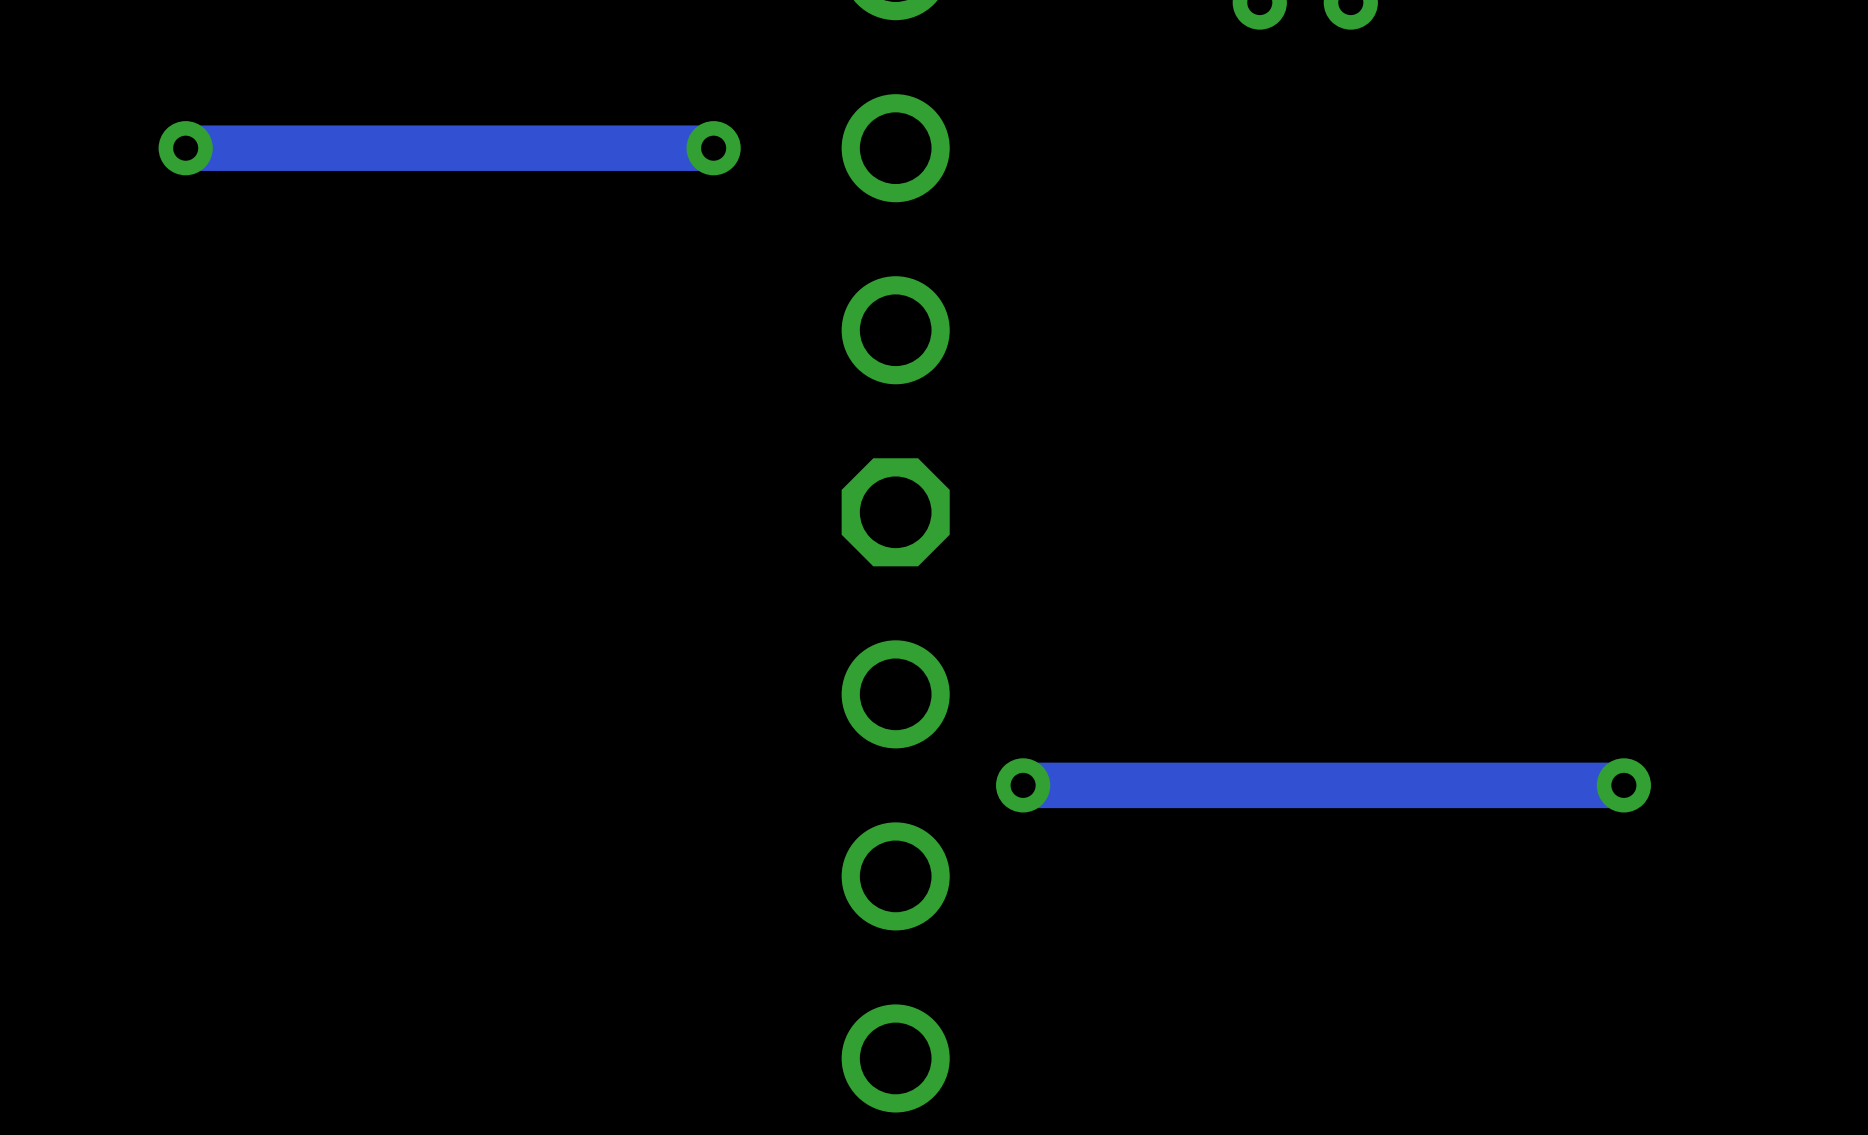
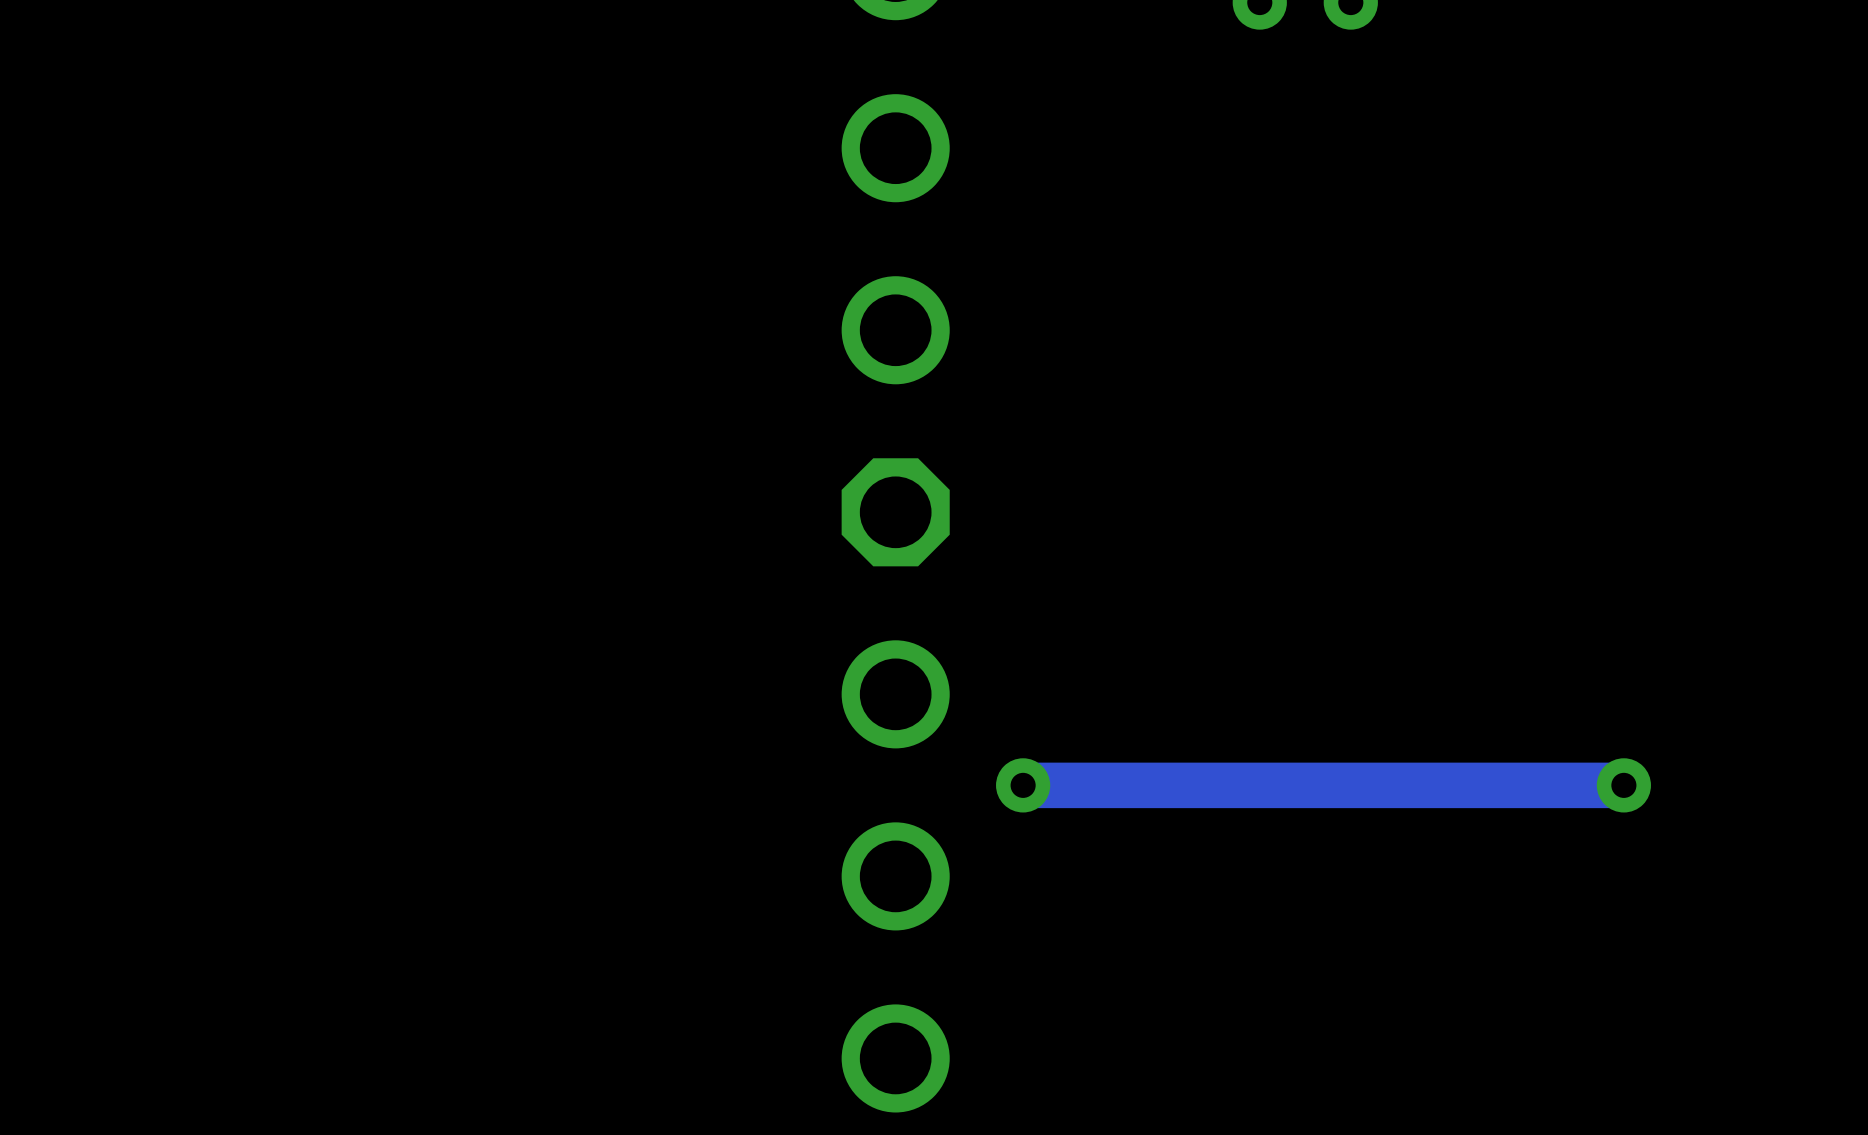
via: (185, 148) -> none
track: (713, 148) (185, 148) -> none
via: (713, 148) -> none

